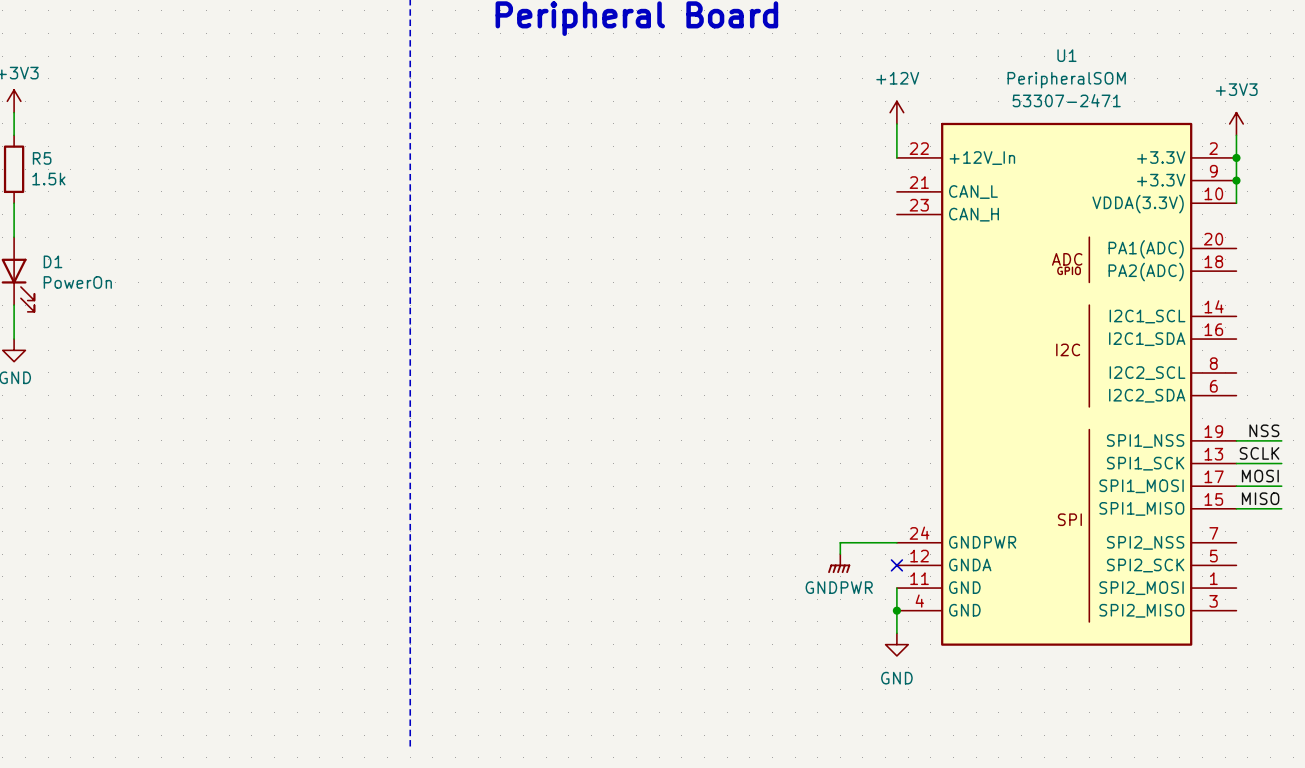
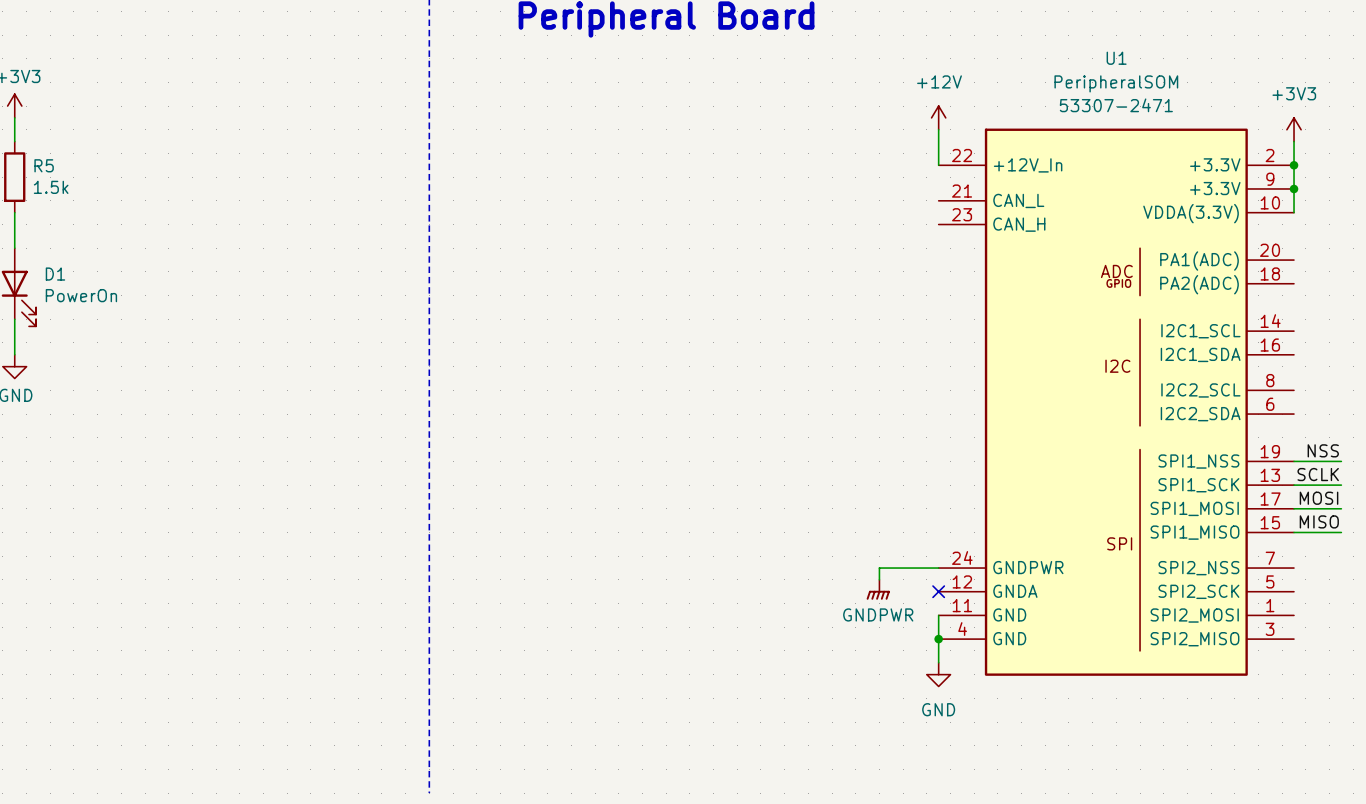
line: none -> (429, 781) (429, 793)

